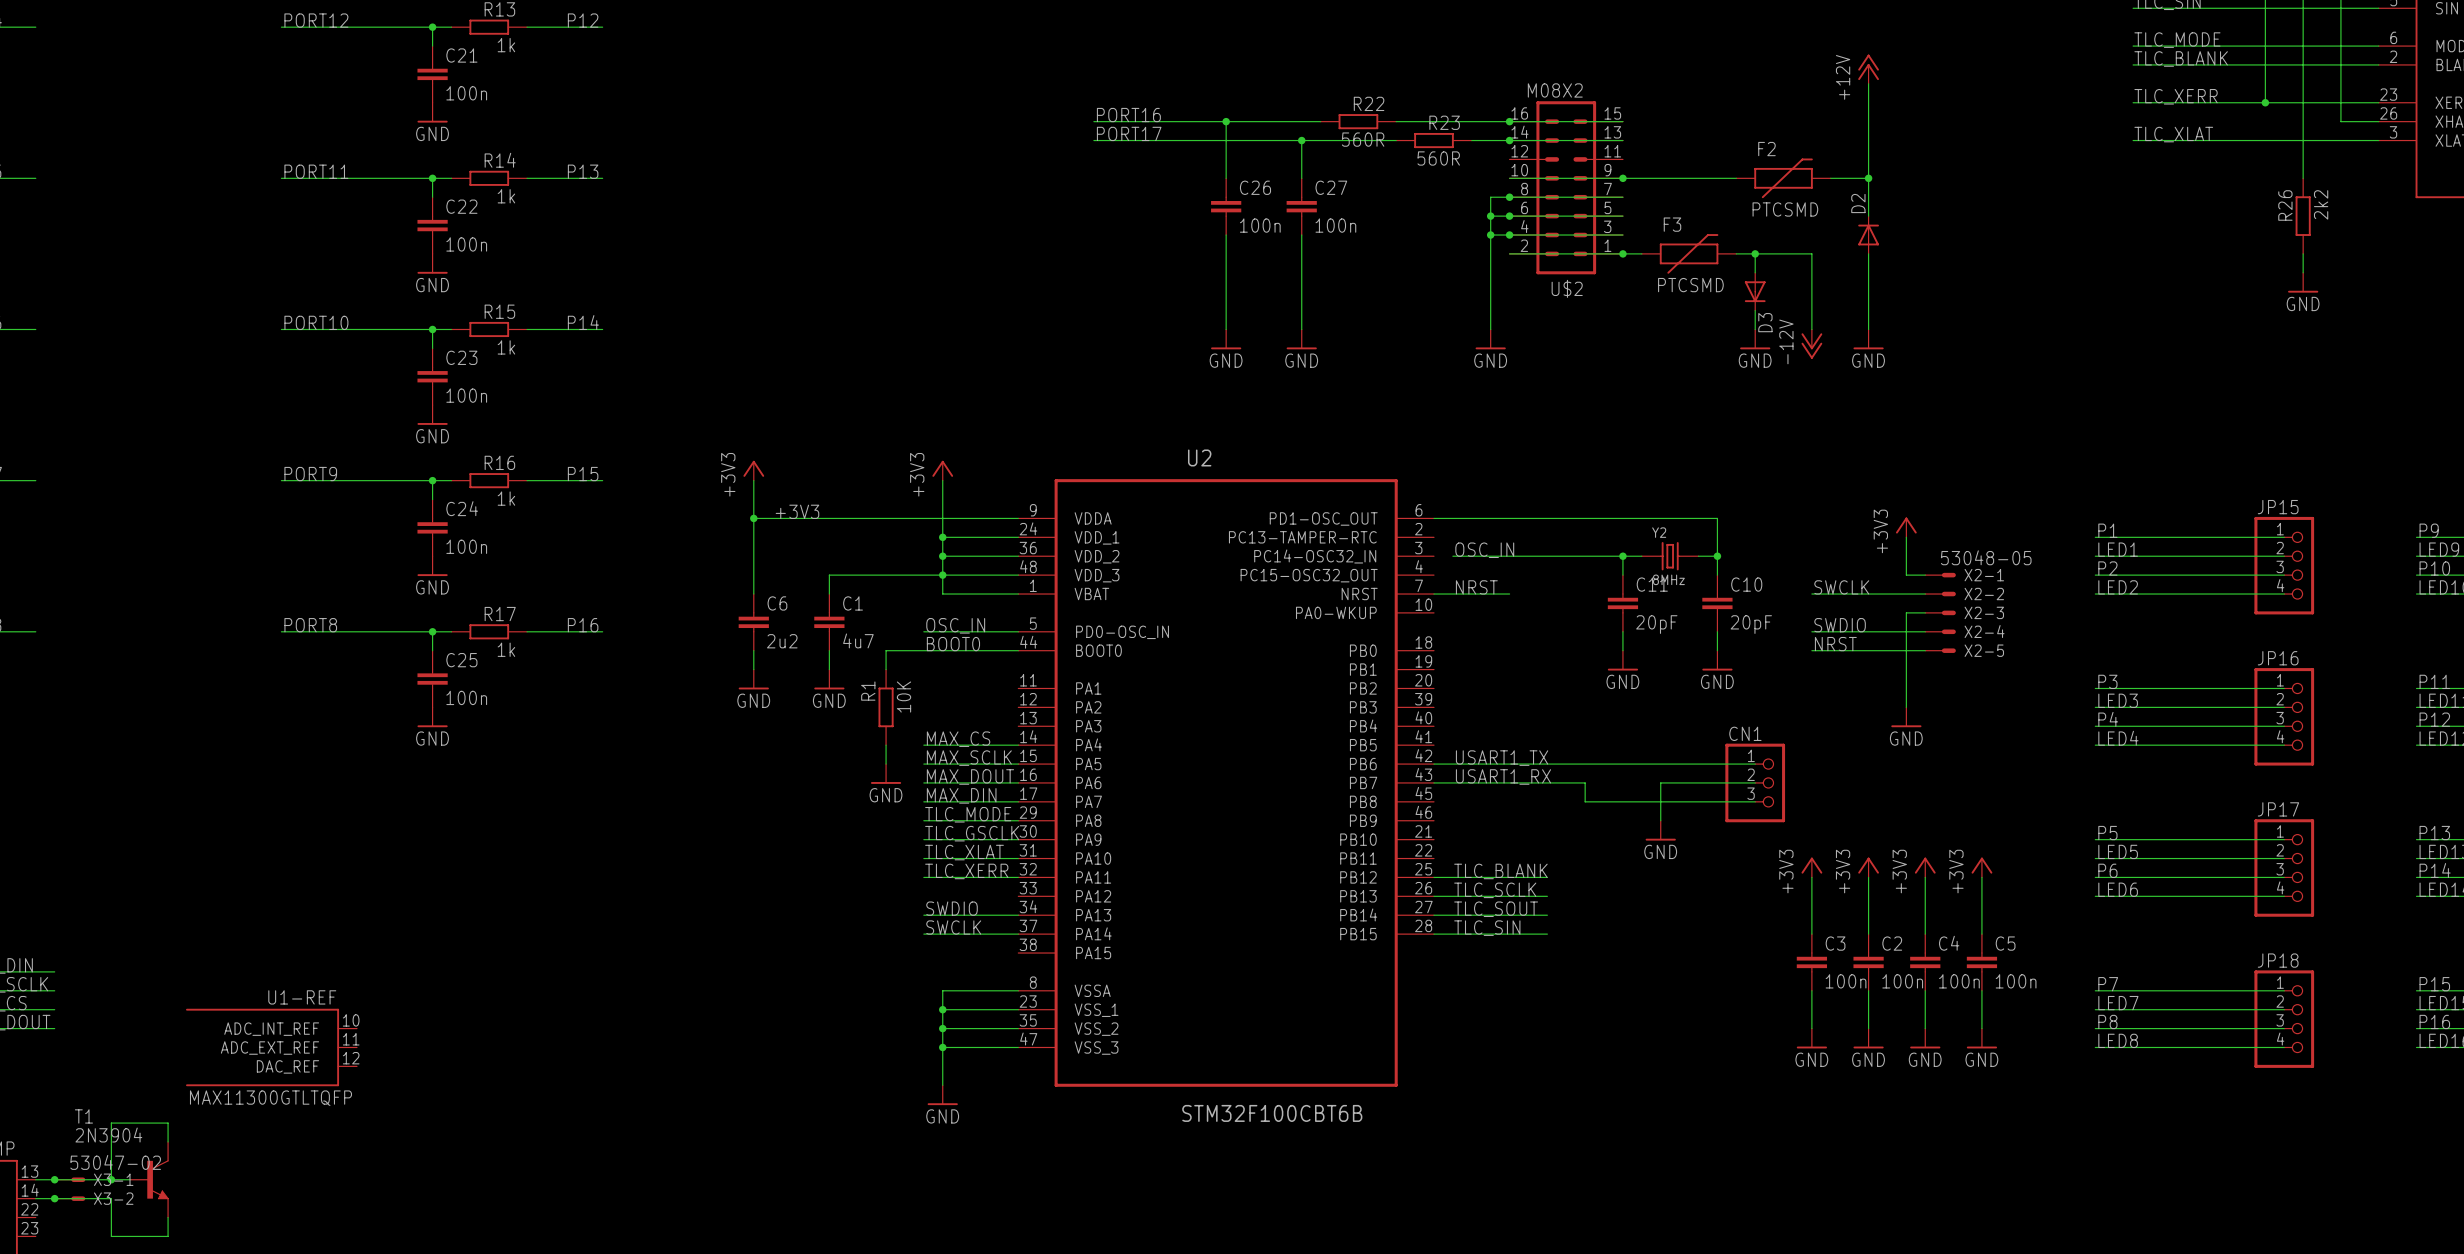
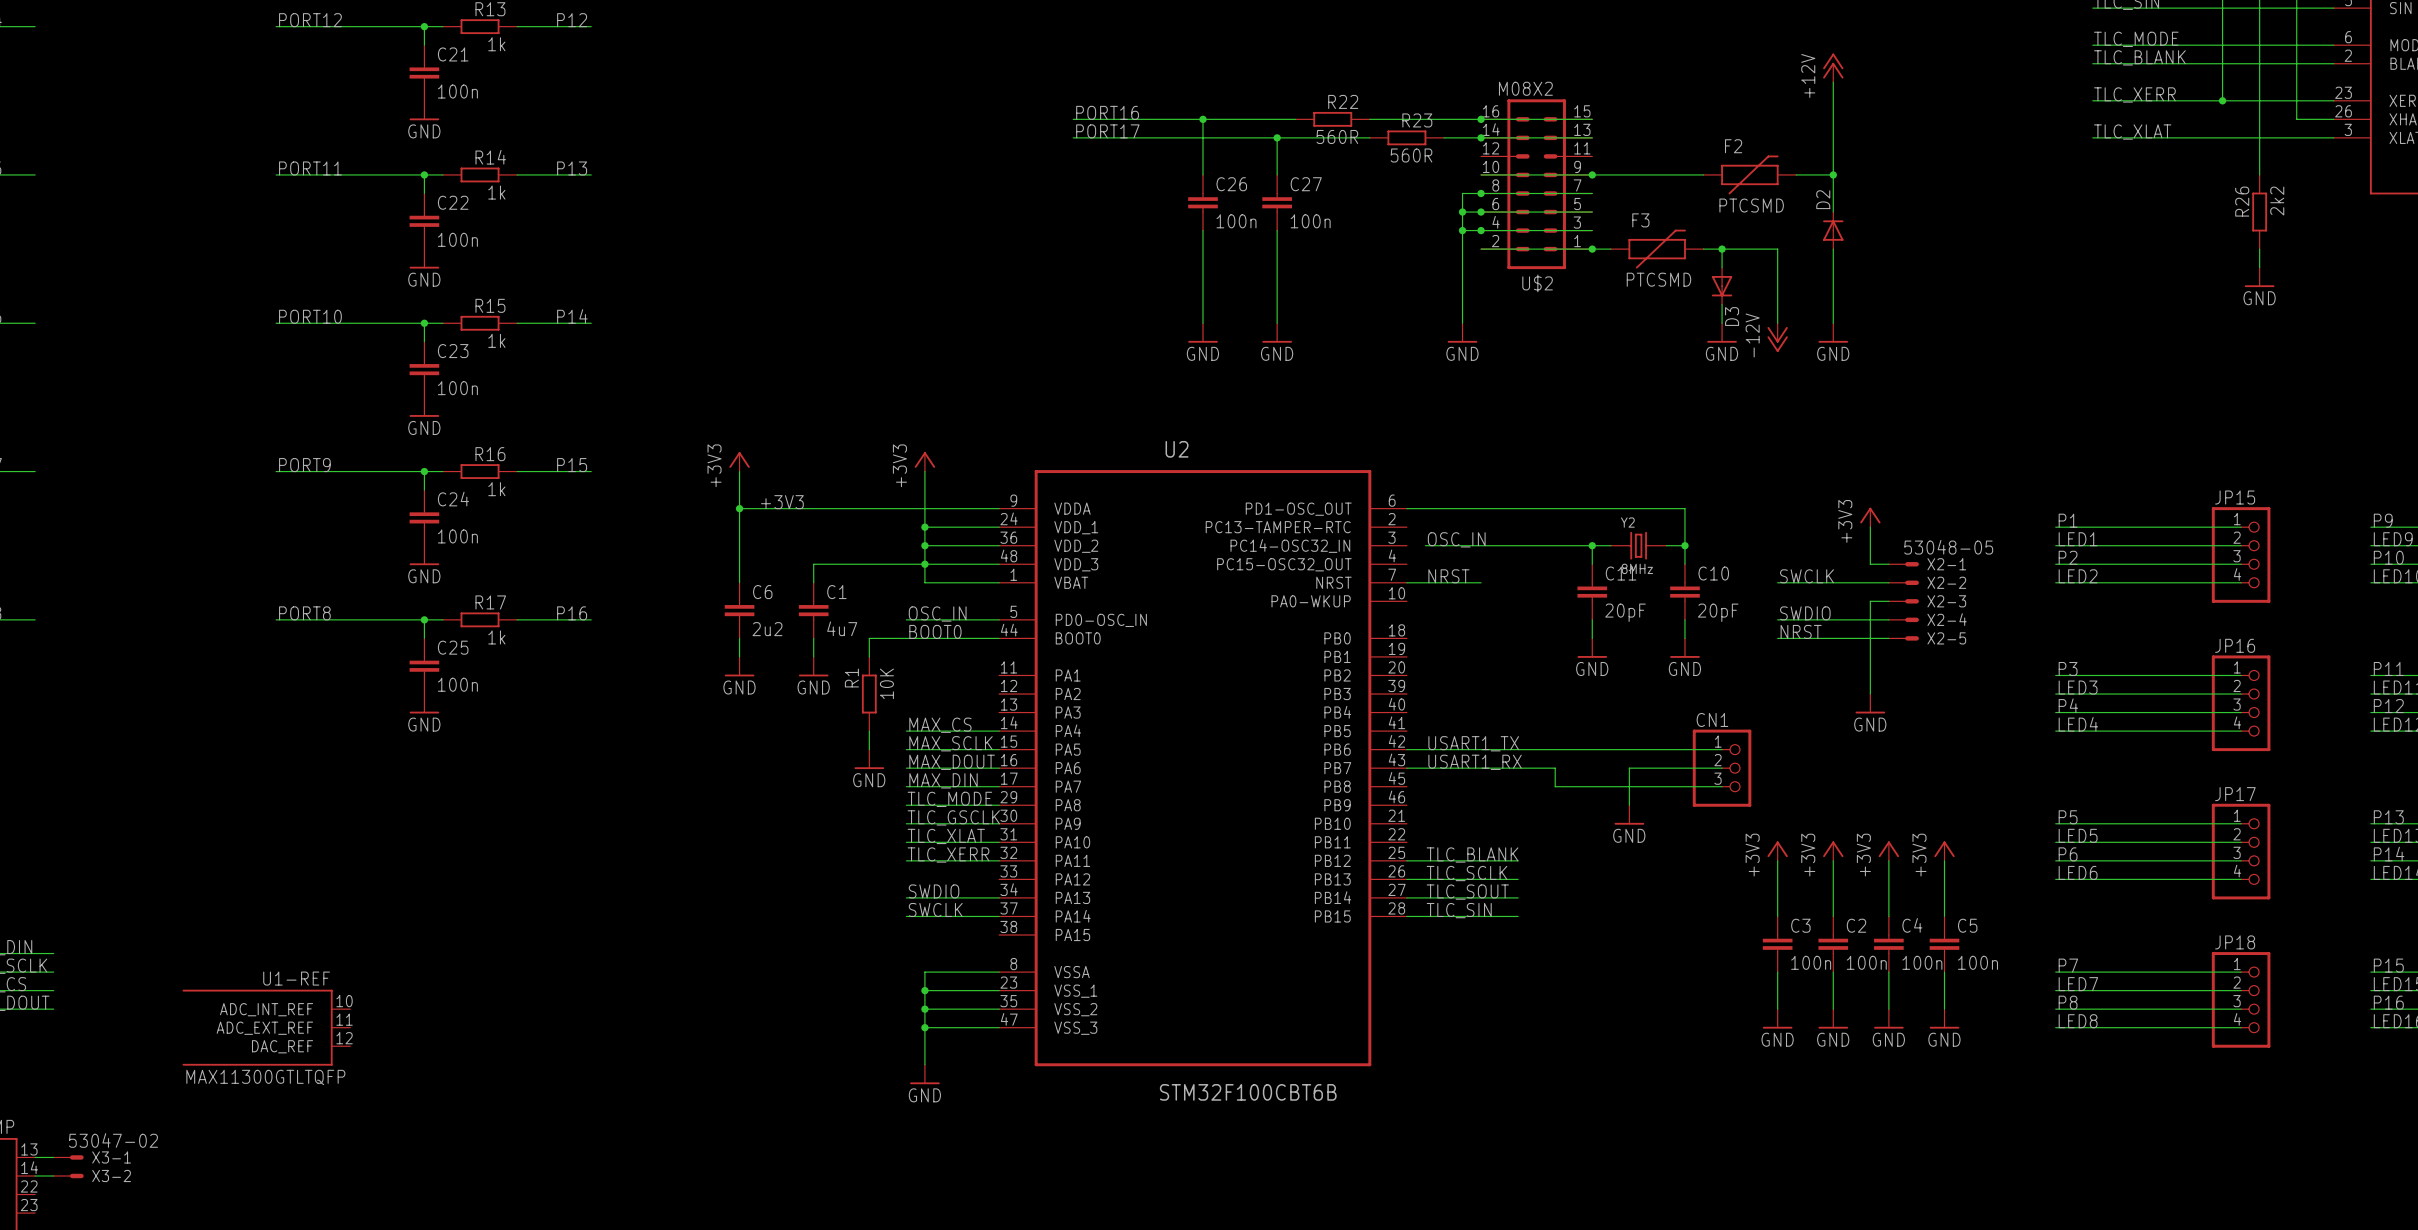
wire: (168, 1141) (168, 1123) (111, 1123) (111, 1179) -> none
wire: (54, 1179) (130, 1179) -> none
junction: (54, 1179) -> none
junction: (111, 1179) -> none
T1: 2N3904 (149, 1179) -> none
wire: (54, 1198) (111, 1198) (111, 1236) (168, 1236) (168, 1217) -> none
junction: (54, 1198) -> none

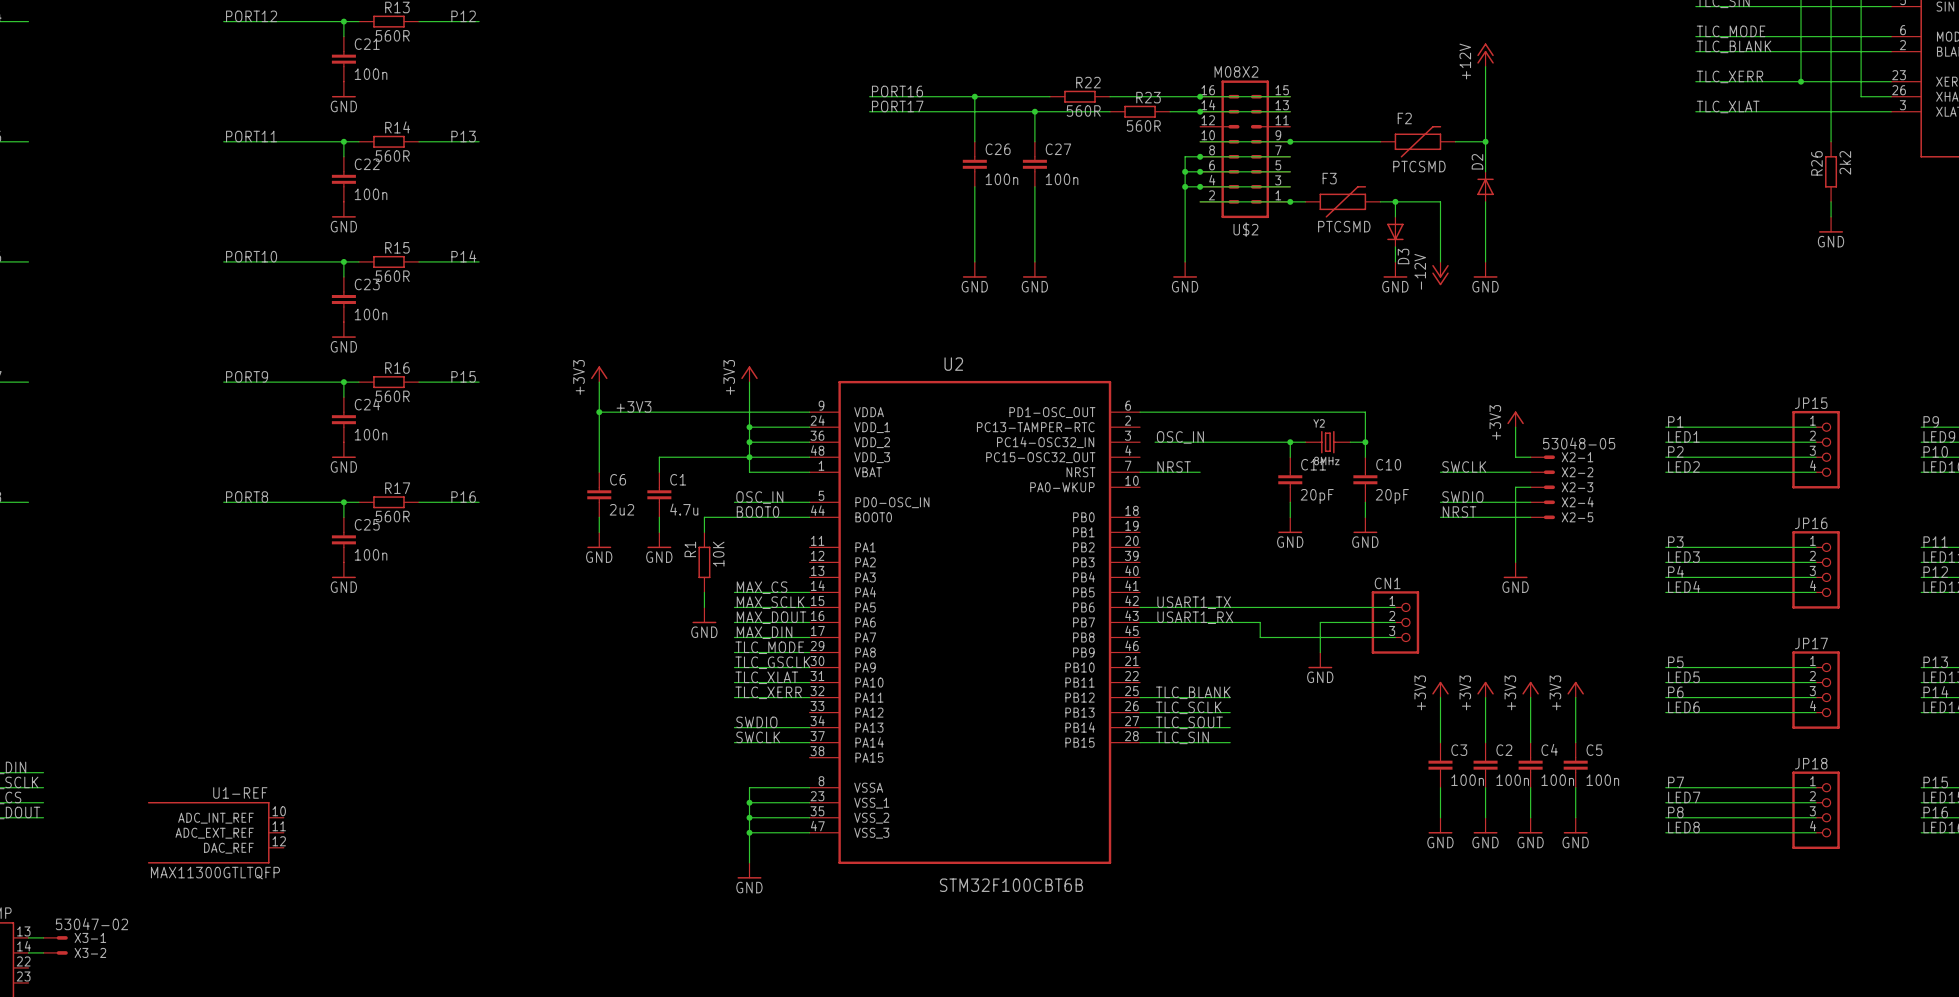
R13 value: 1k (496, 44) -> 560R (392, 35)
R14 value: 1k (496, 192) -> 560R (392, 156)
R15 value: 1k (496, 340) -> 560R (392, 276)
R16 value: 1k (496, 489) -> 560R (392, 396)
C1 value: 4u7 (842, 628) -> 4.7u (684, 509)
R17 value: 1k (496, 637) -> 560R (392, 516)

